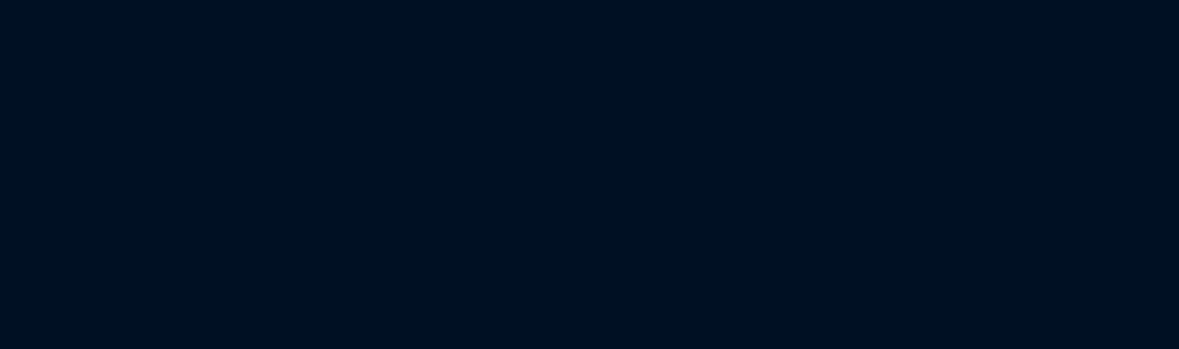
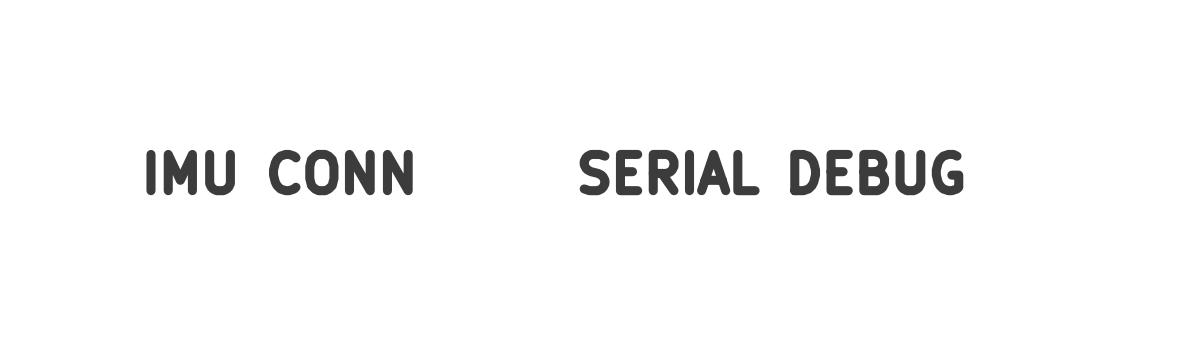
text: none -> IMU CONN (279, 172)
text: none -> SERIAL DEBUG (771, 172)

